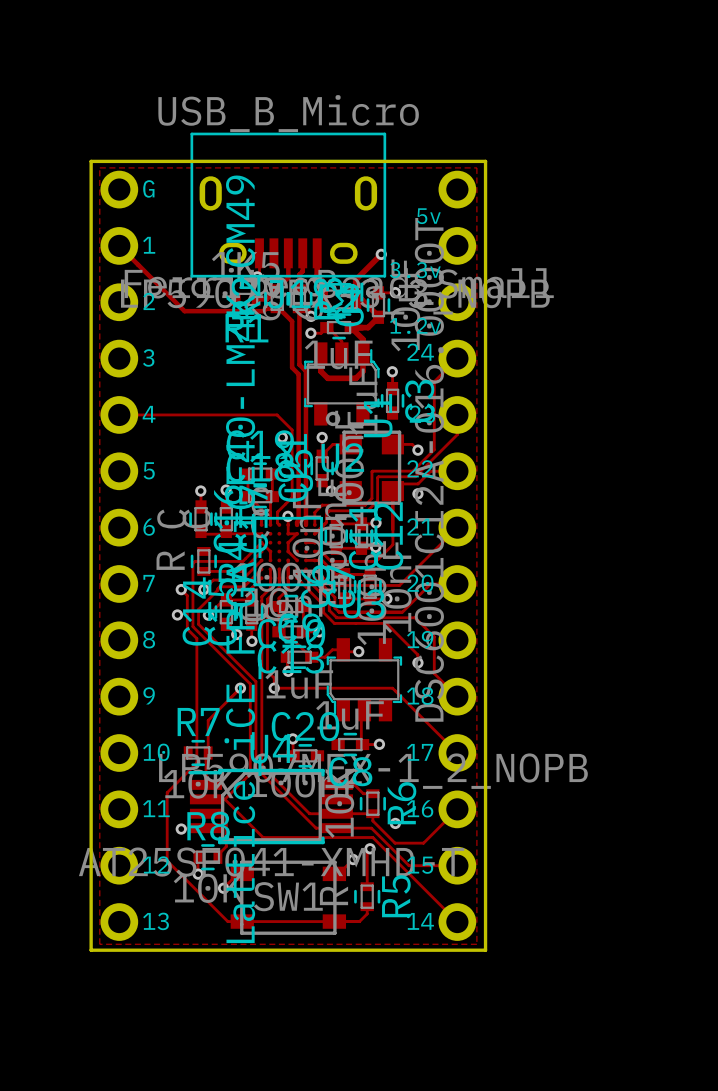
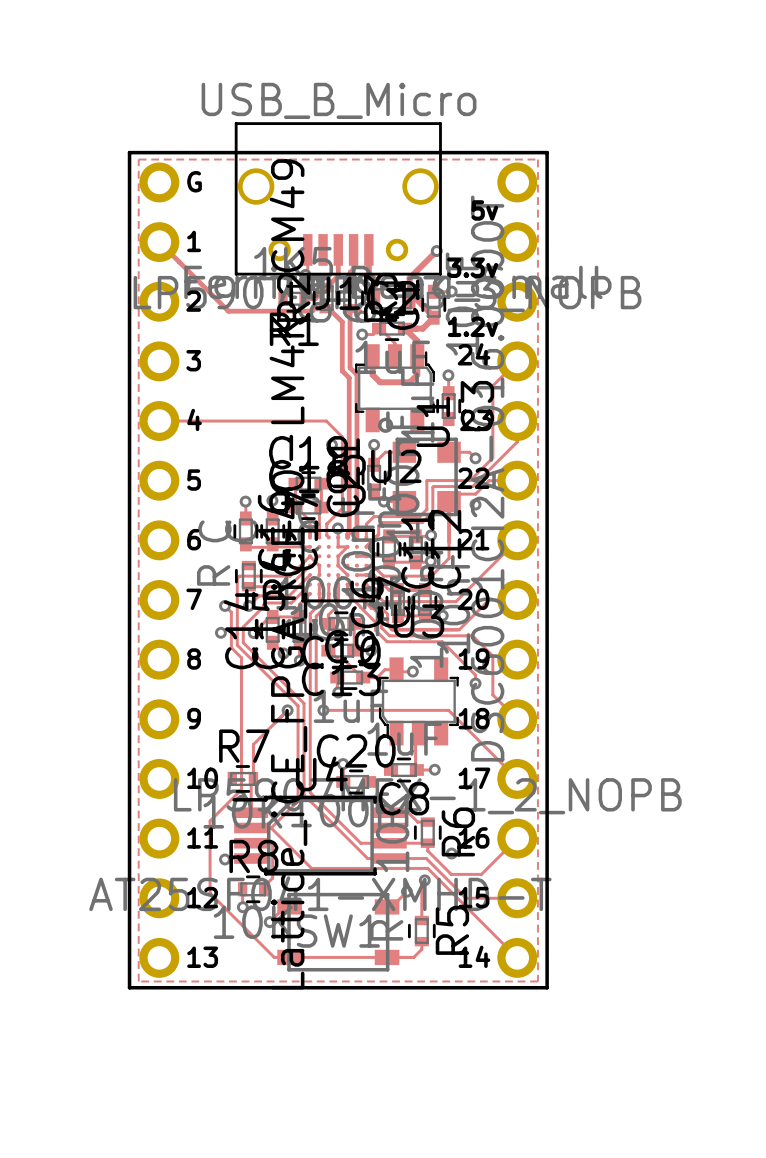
J1 footprint: [190, 132, 387, 278] -> [234, 122, 442, 276]

